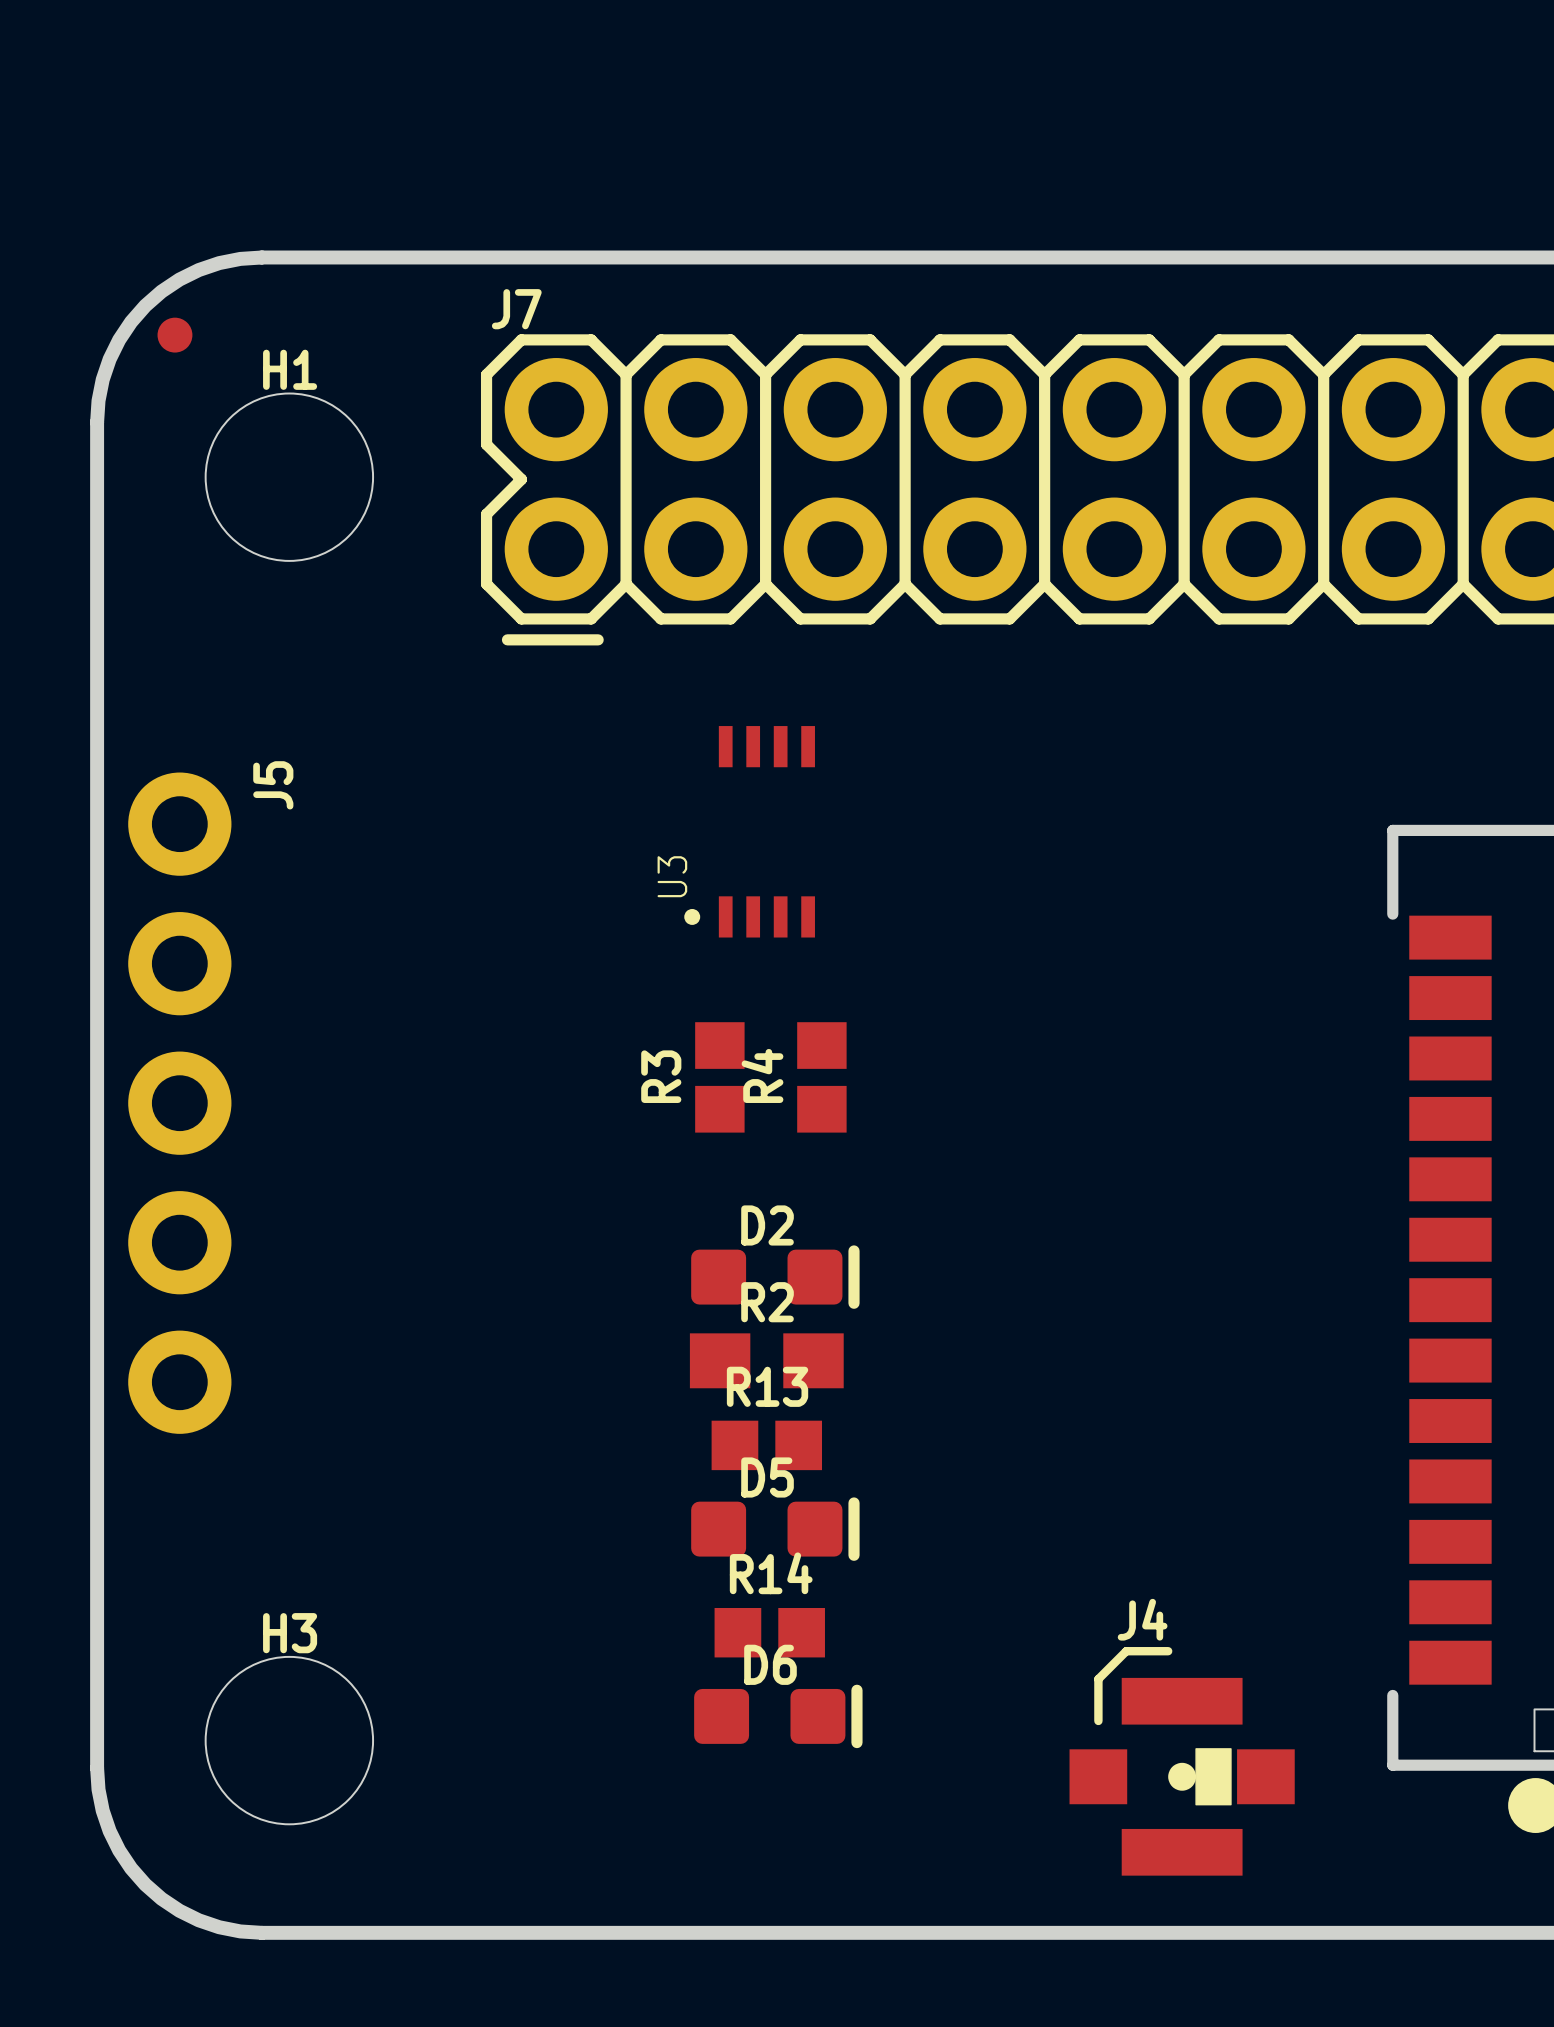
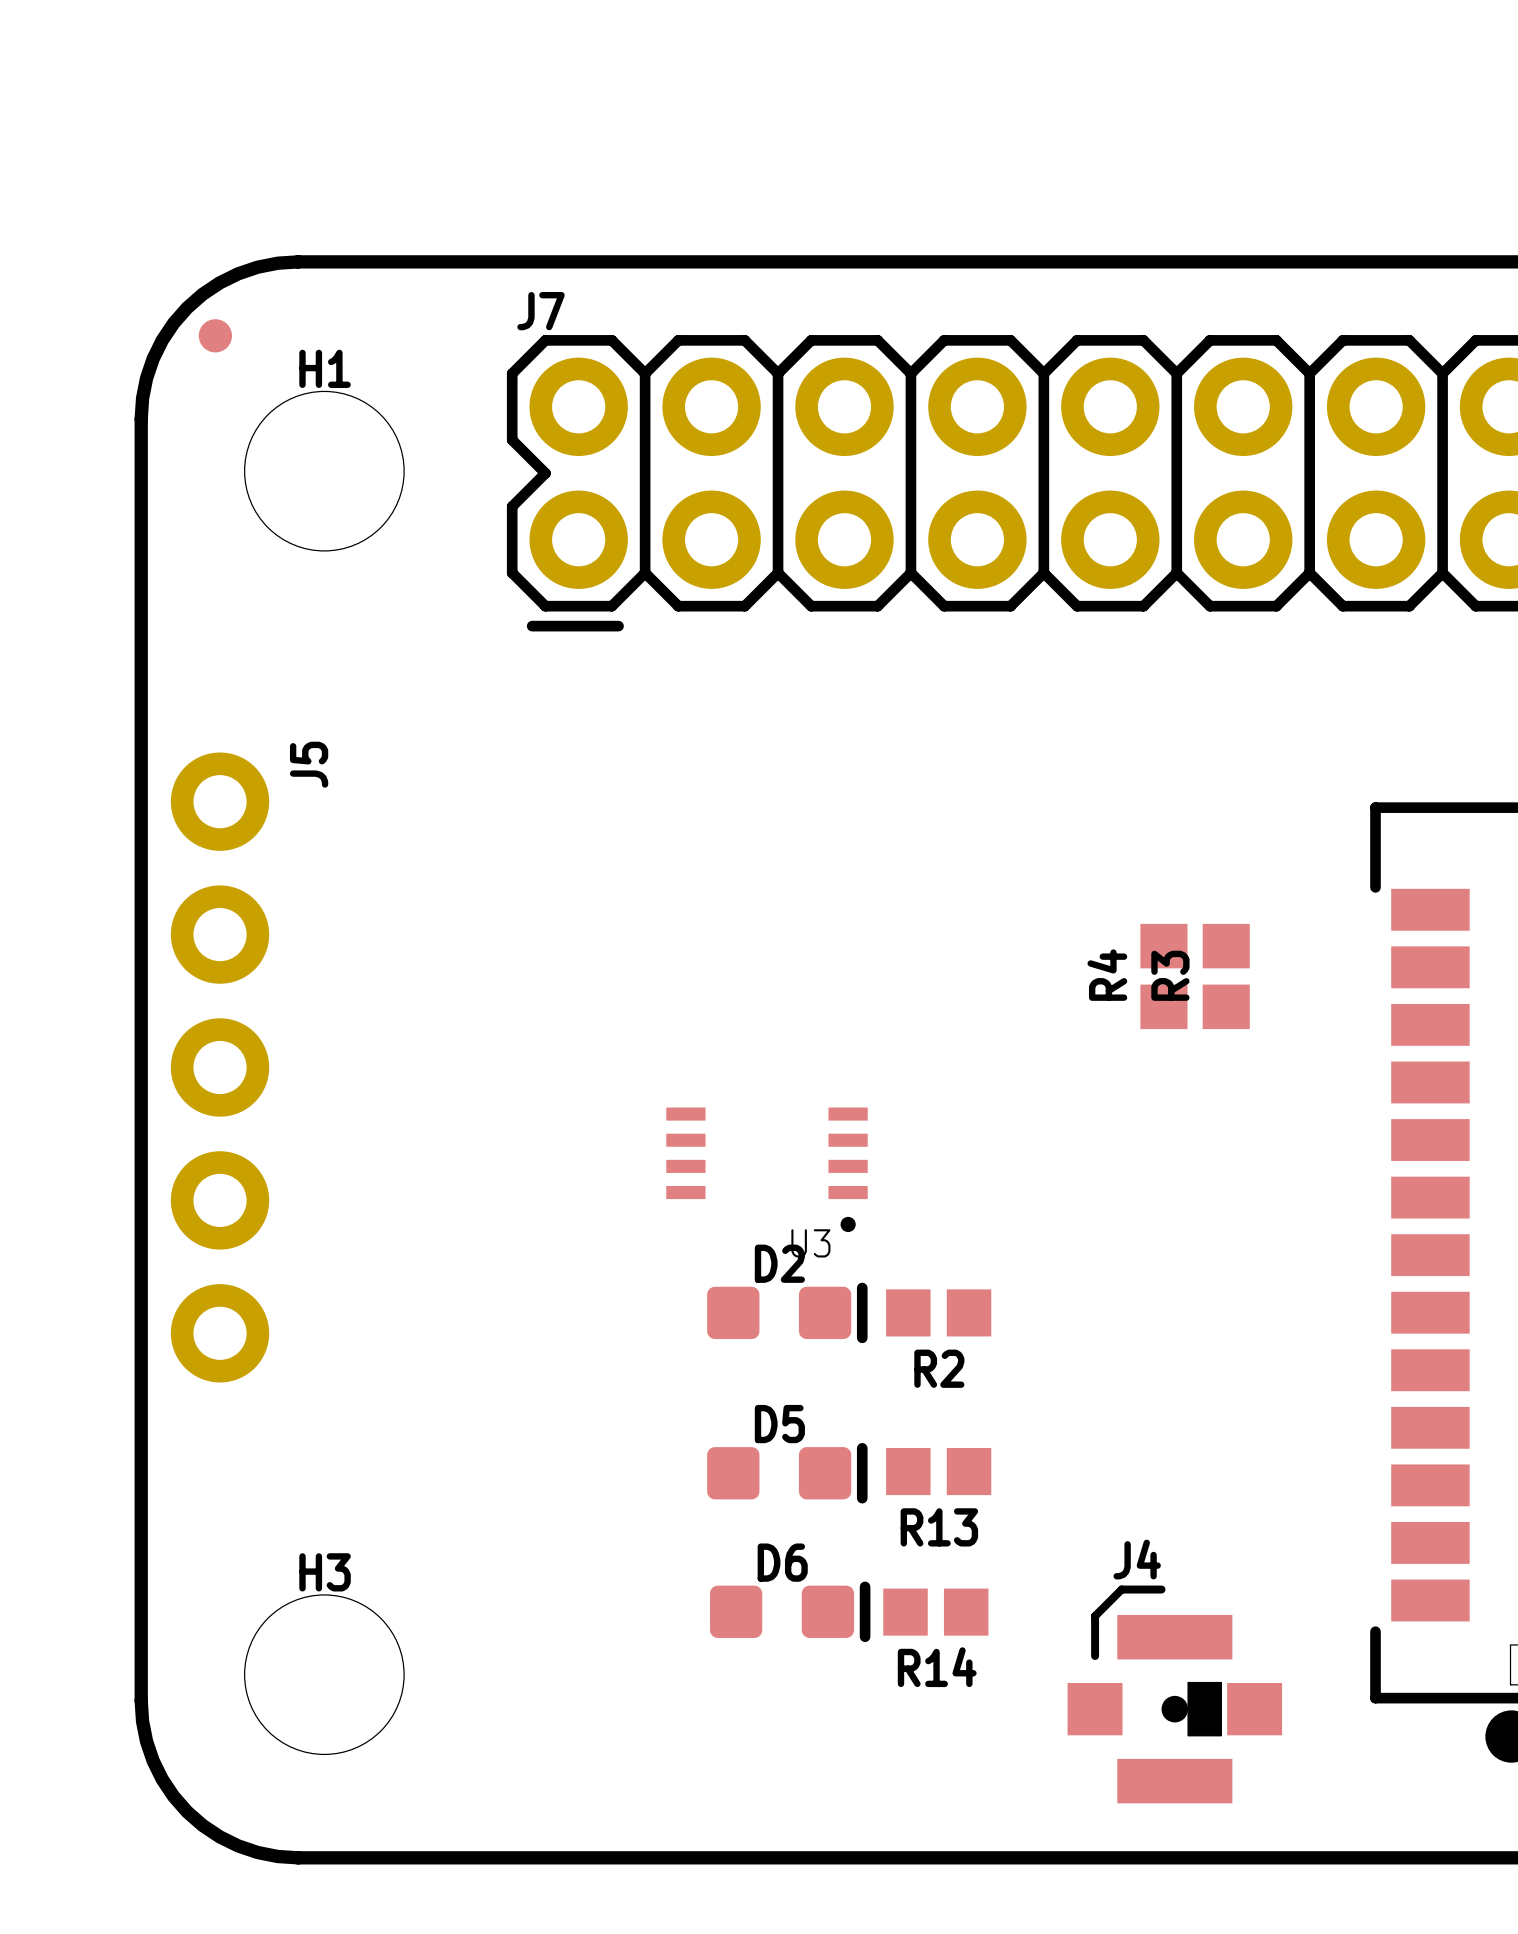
U3 rotation: 0° (749, 831) -> 90° counterclockwise (766, 1169)
U3 position: (749, 831) -> (766, 1169)
R3 position: (719, 1077) -> (1226, 976)
R4 position: (821, 1077) -> (1163, 976)
D2 position: (775, 1277) -> (787, 1312)
R2 name position: R2 (767, 1302) -> R2 (939, 1368)
R2 footprint: [689, 1333, 844, 1389] -> [886, 1289, 992, 1337]
R13 name position: R13 (767, 1386) -> R13 (939, 1527)
R13 position: (766, 1445) -> (938, 1471)
R14 name position: R14 (771, 1573) -> R14 (937, 1667)
R14 position: (769, 1632) -> (935, 1612)
D6 position: (778, 1716) -> (790, 1611)

